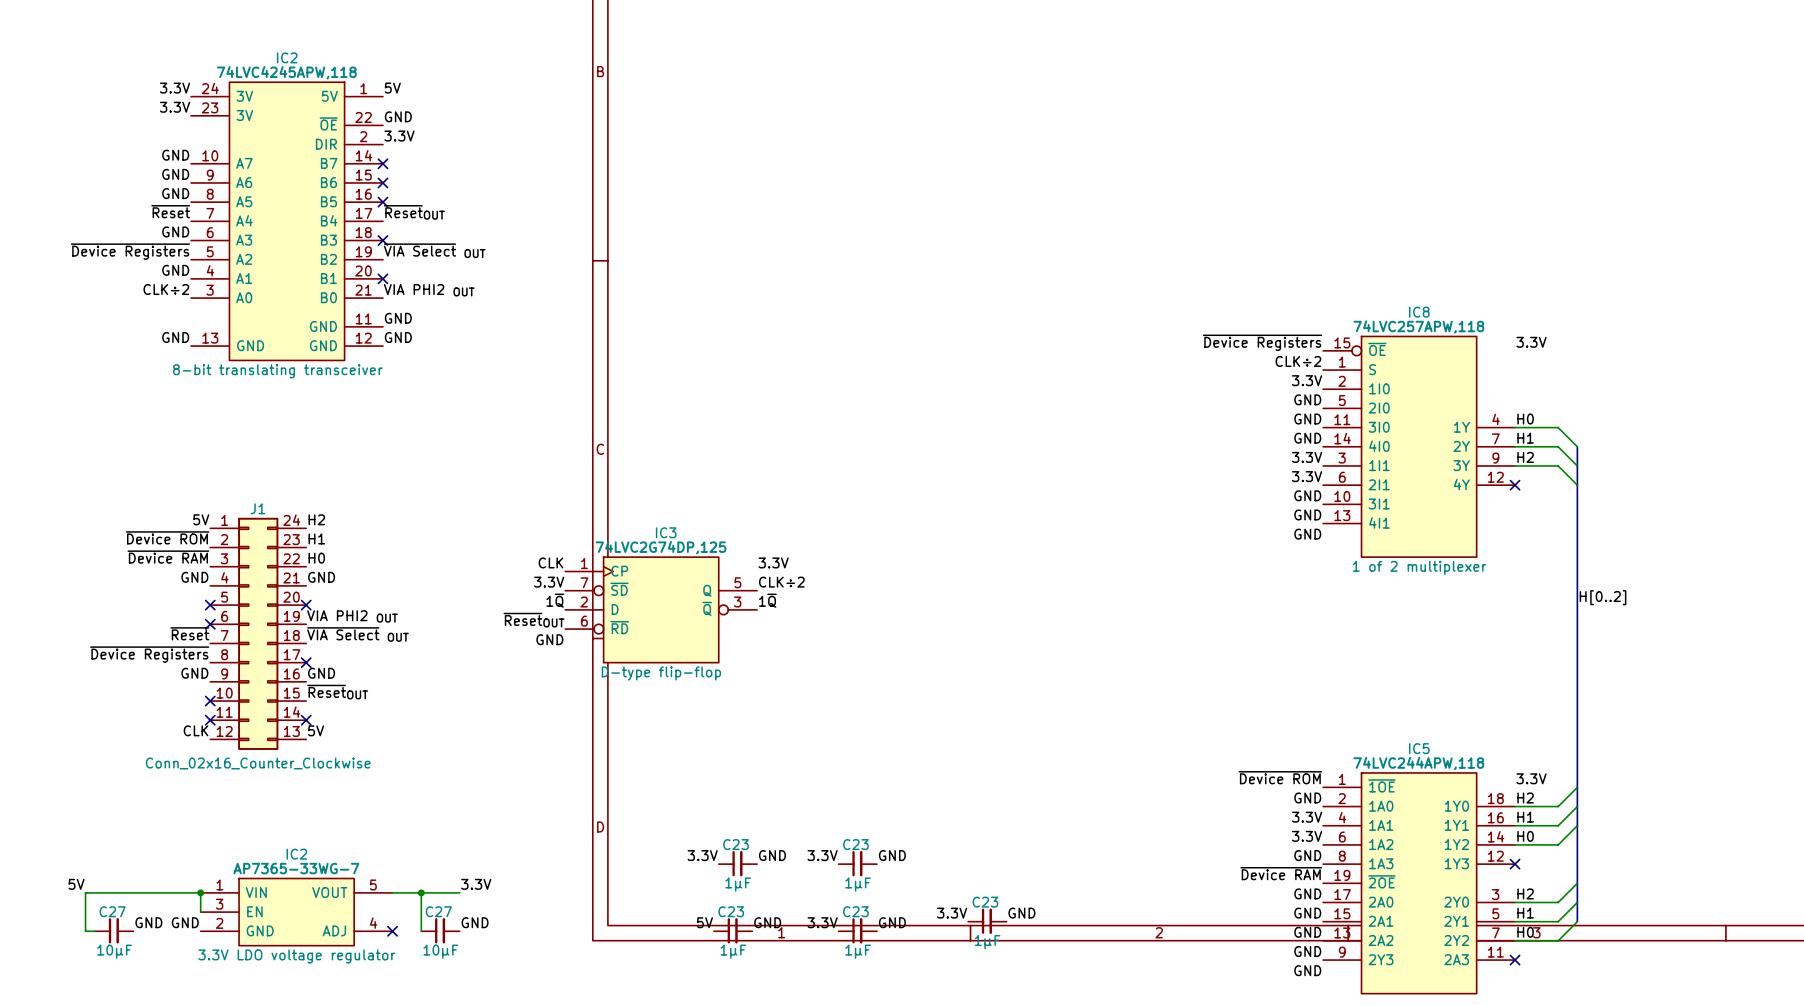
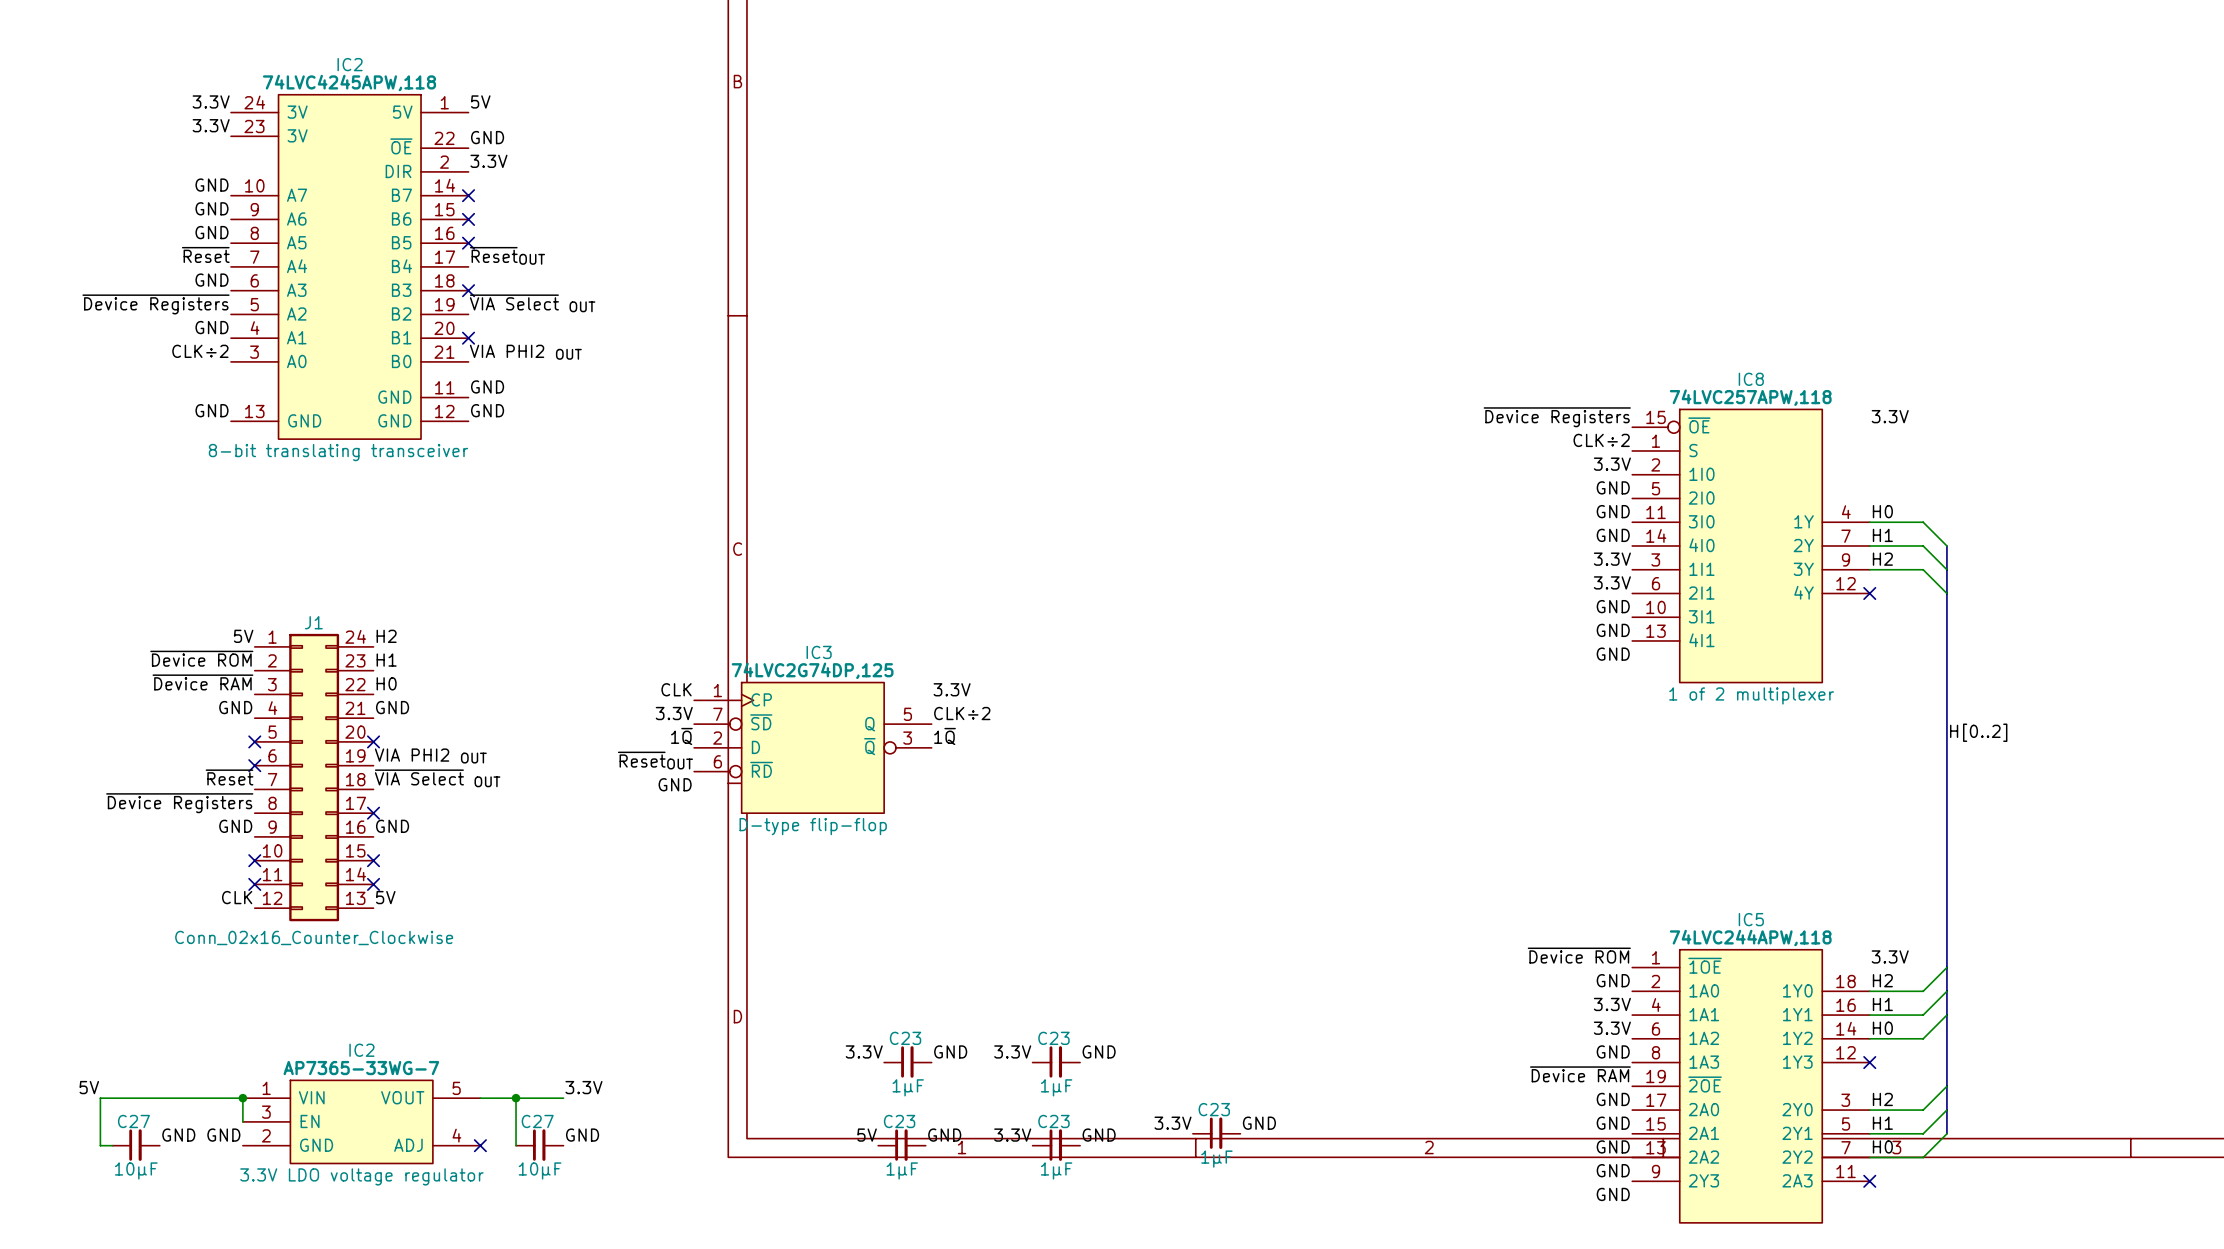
label: ~{Reset}OUT (337, 692) -> none
no-connect mark: none -> (373, 860)

